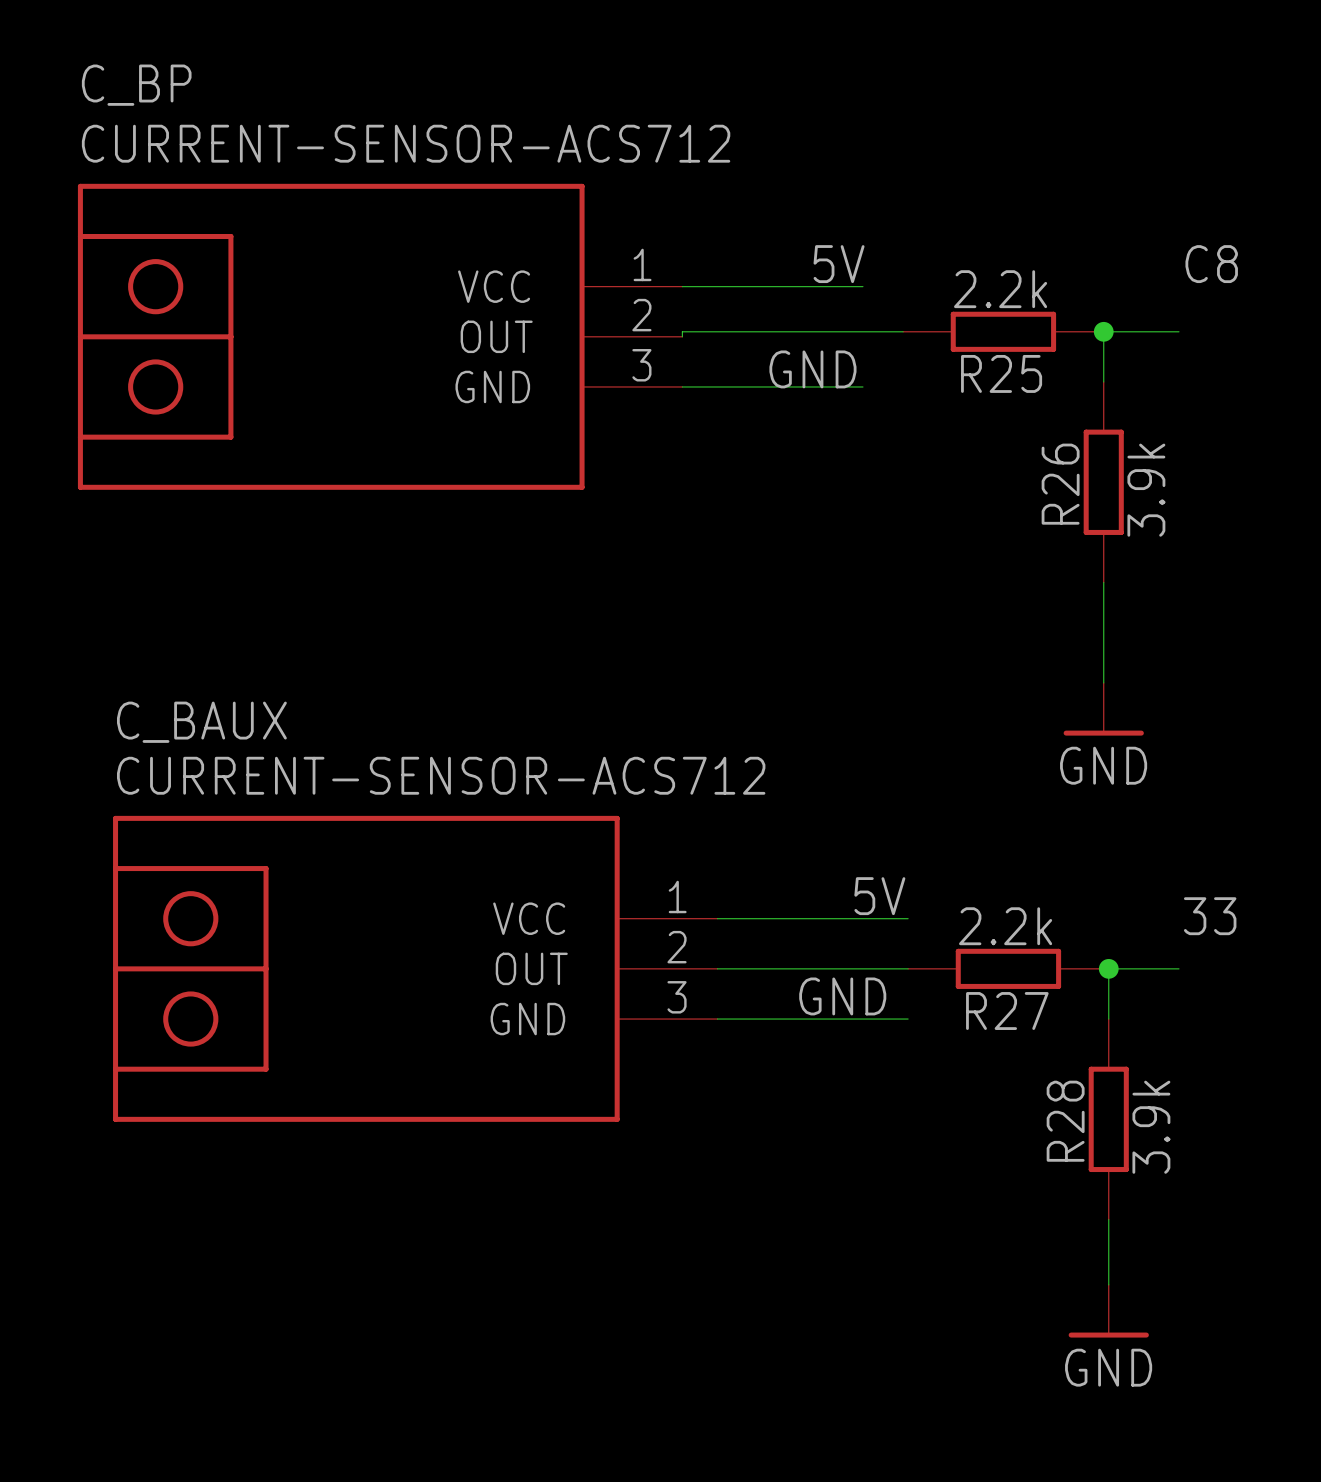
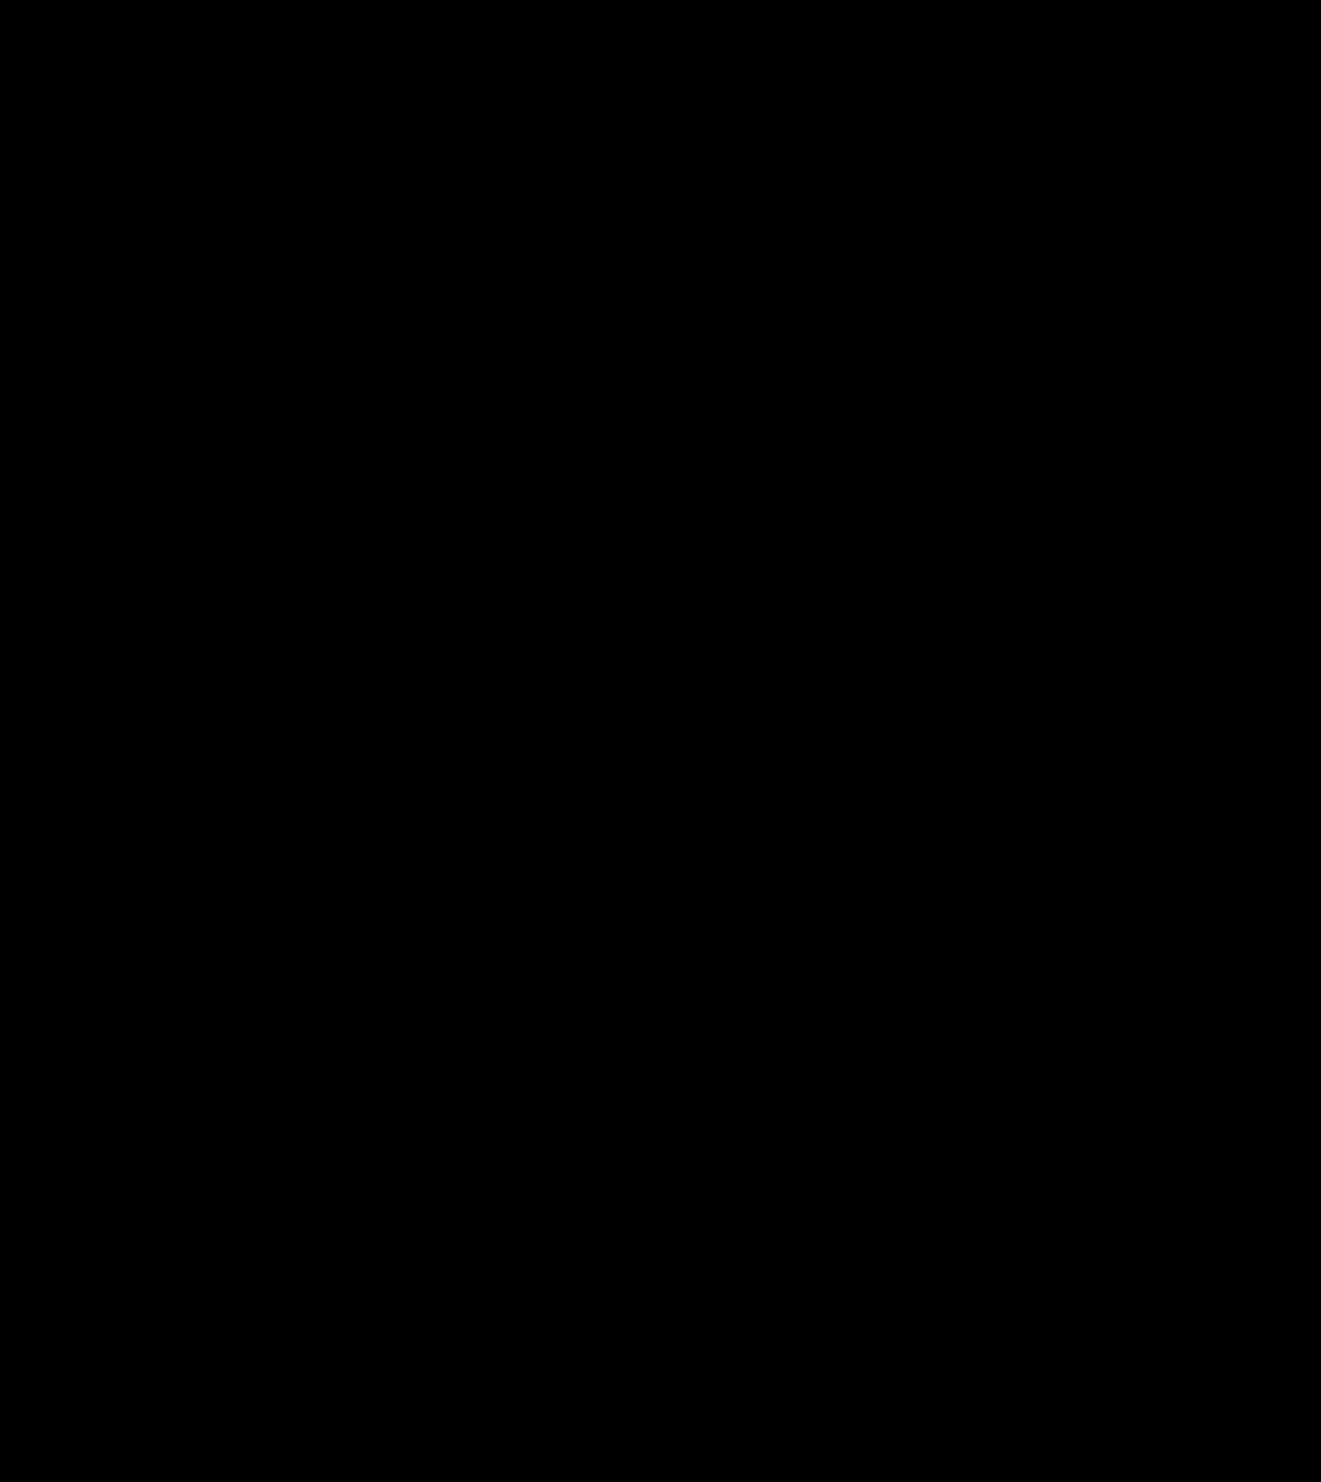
label: 5V (839, 264) -> none
label: C8 (1211, 264) -> none
wire: (682, 286) (862, 286) -> none
wire: (903, 331) (682, 331) (682, 336) -> none
R25: 2.2k (1003, 331) -> none
junction: (1103, 331) -> none
wire: (1178, 331) (1103, 331) (1103, 381) -> none
C_BP: CURRENT-SENSOR-ACS712 (380, 336) -> none
label: GND (812, 369) -> none
wire: (682, 386) (862, 386) -> none
R26: 3.9k (1103, 482) -> none
wire: (1103, 582) (1103, 682) -> none
power symbol: GND (1103, 709) -> none
label: 5V (879, 896) -> none
label: 33 (1210, 916) -> none
wire: (717, 918) (908, 918) -> none
C_BAUX: CURRENT-SENSOR-ACS712 (415, 968) -> none
wire: (717, 968) (908, 968) -> none
R27: 2.2k (1008, 968) -> none
junction: (1108, 968) -> none
wire: (1178, 968) (1108, 968) (1108, 1019) -> none
label: GND (842, 996) -> none
wire: (717, 1019) (908, 1019) -> none
R28: 3.9k (1108, 1119) -> none
wire: (1108, 1219) (1108, 1284) -> none
power symbol: GND (1108, 1311) -> none

